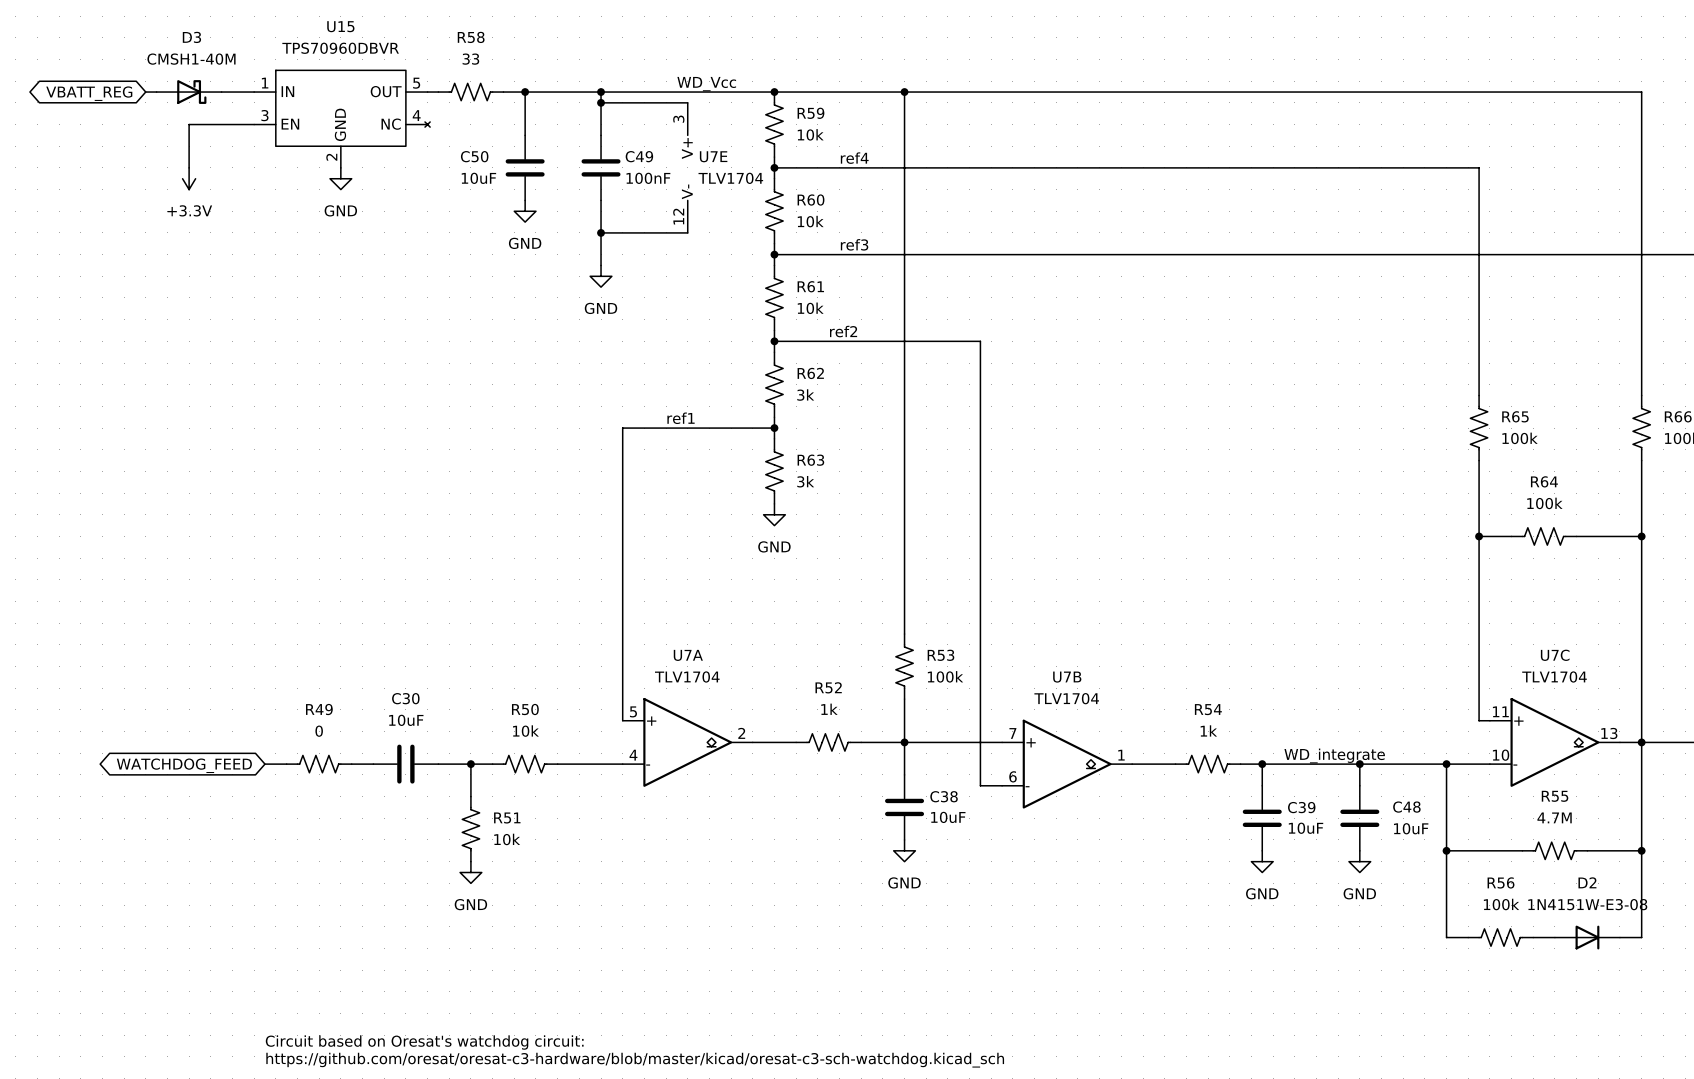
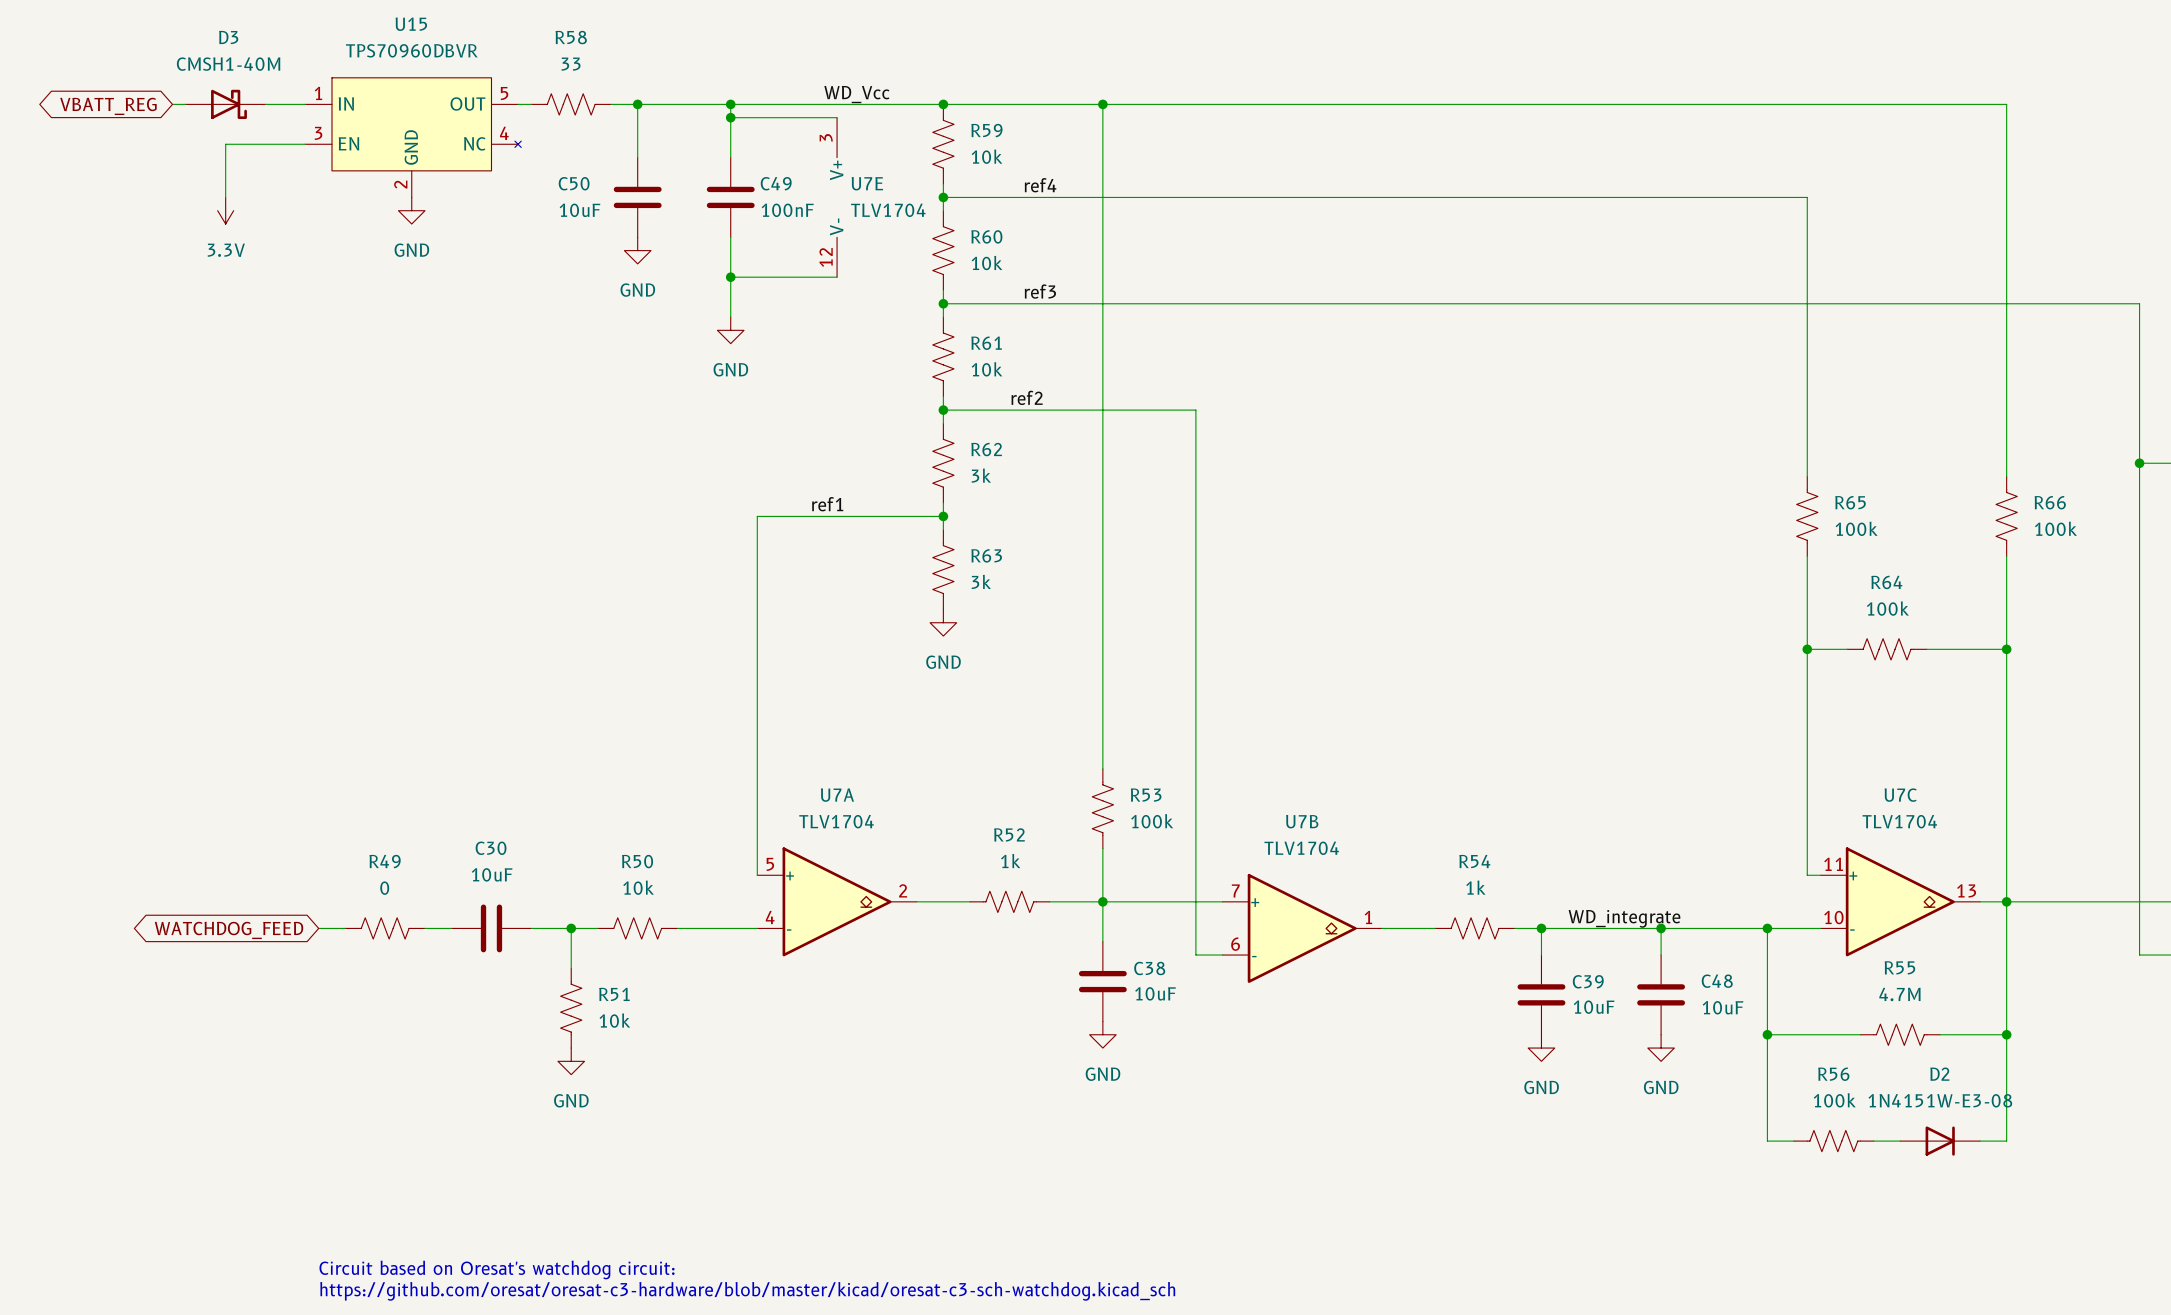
power symbol: +3.3V (189, 178) -> 3.3V (225, 210)

